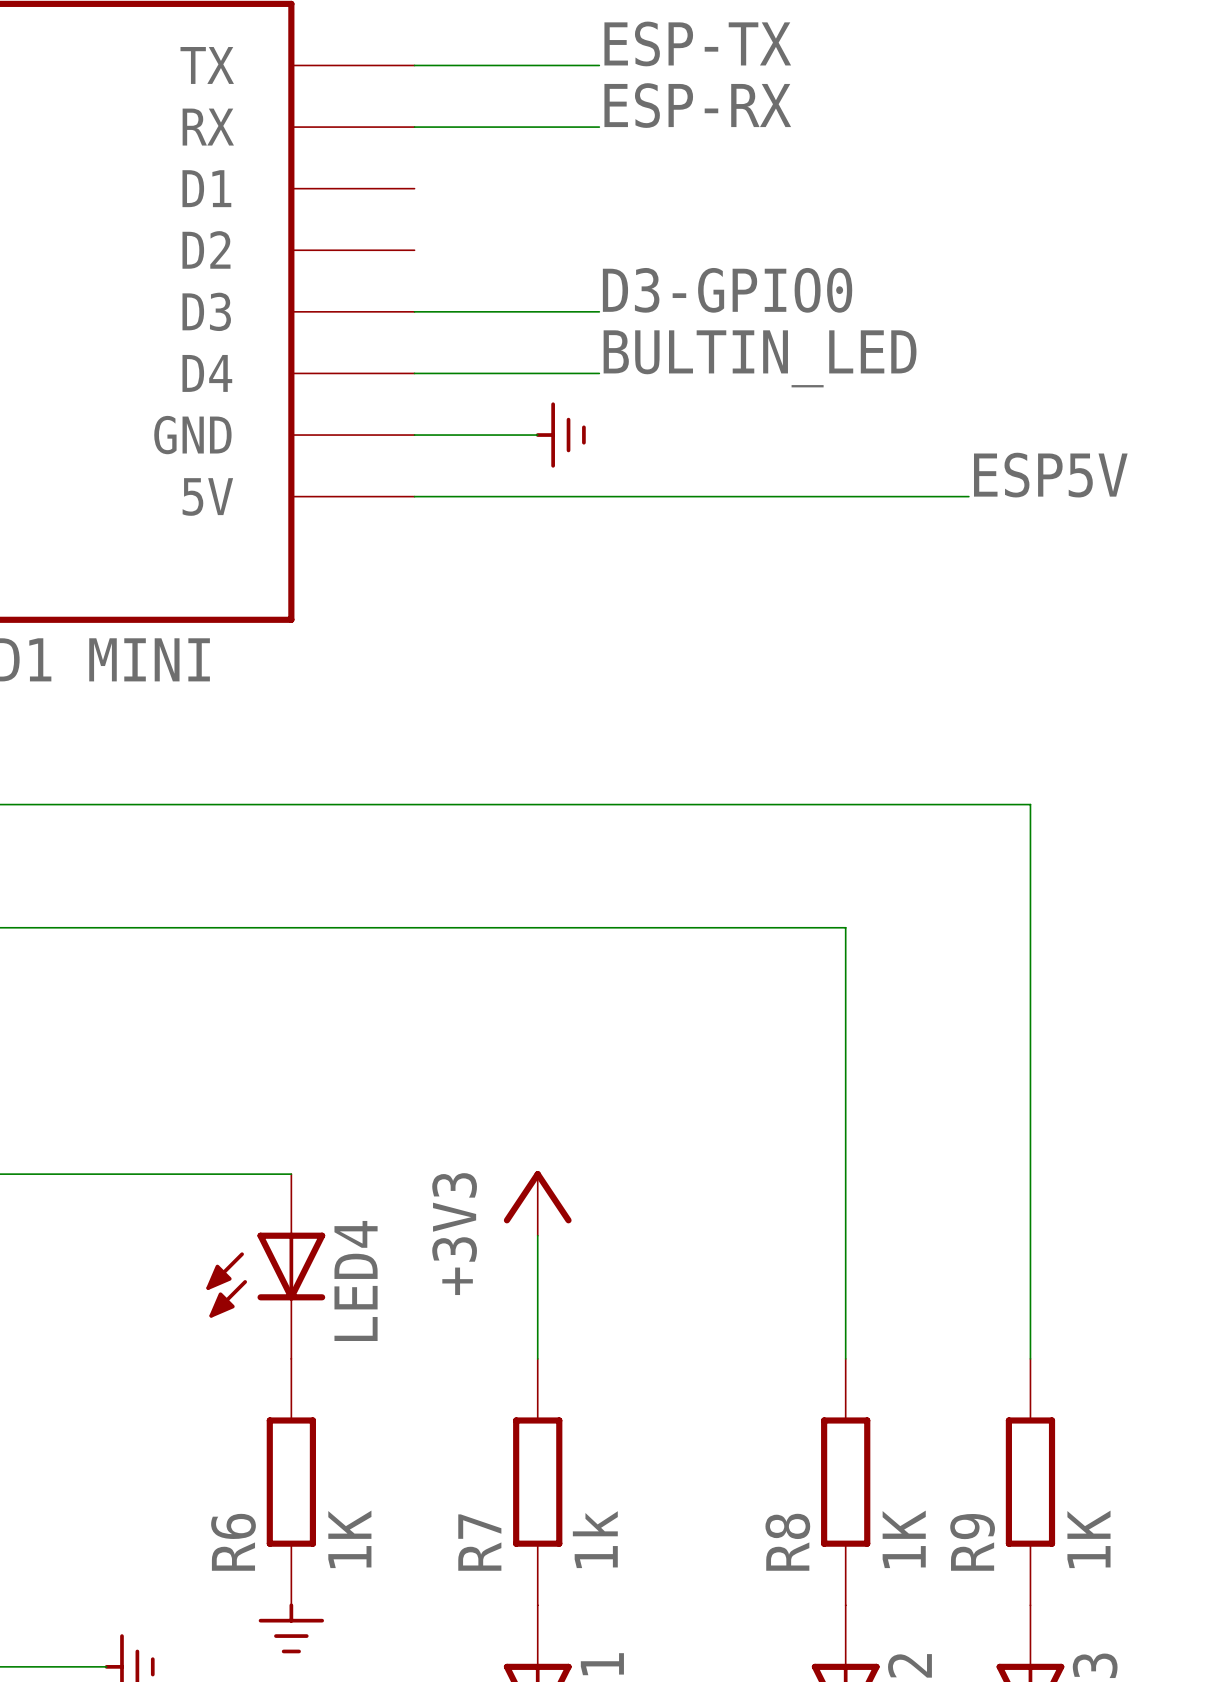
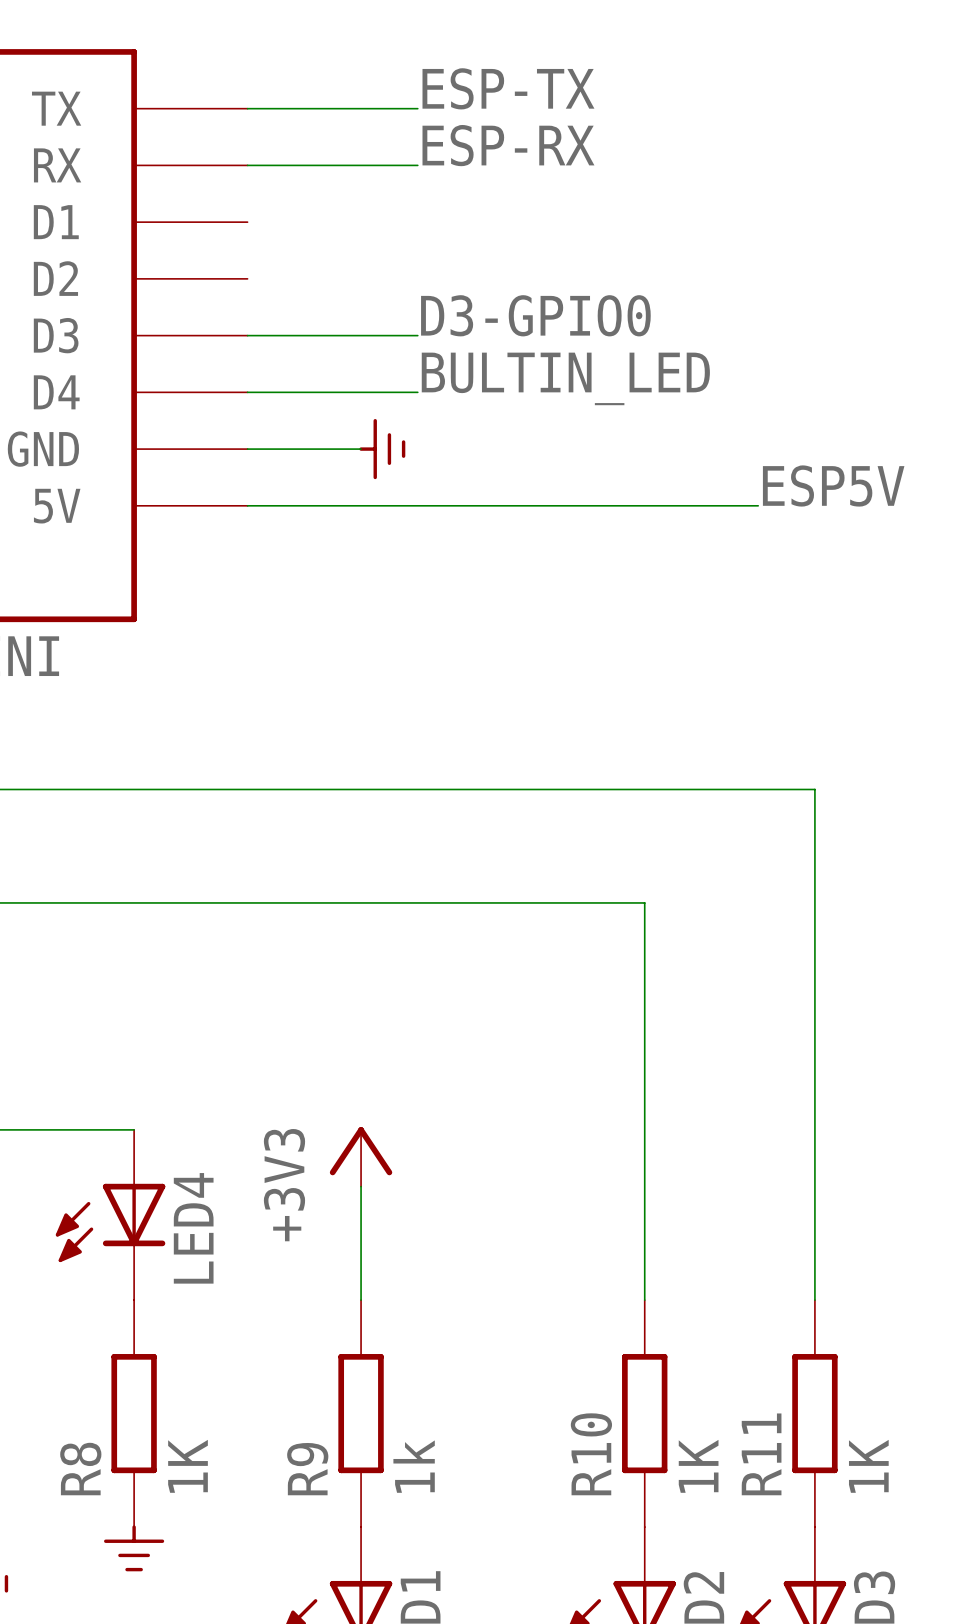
R6 name: R6 (233, 1542) -> R8 (80, 1469)
R7 name: R7 (479, 1542) -> R9 (307, 1469)
R8 name: R8 (787, 1542) -> R10 (591, 1454)
R9 name: R9 (972, 1542) -> R11 (761, 1454)

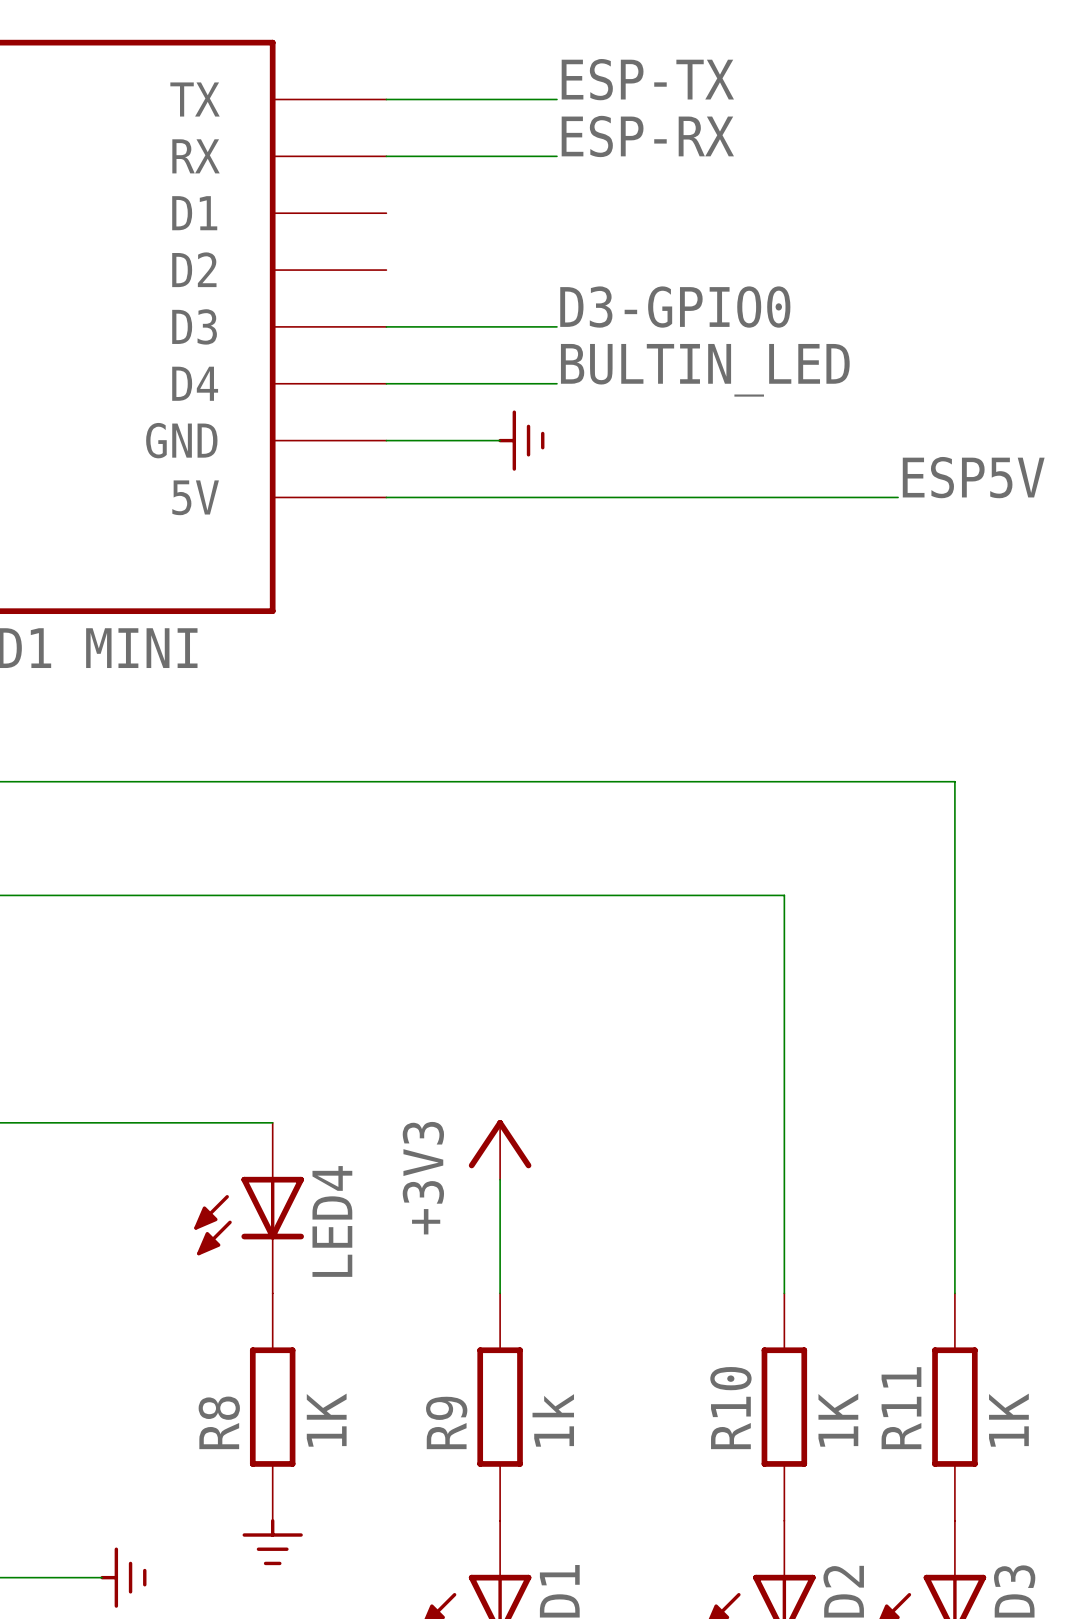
R10 name position: R10 (591, 1454) -> R10 (730, 1408)
R11 name position: R11 (761, 1454) -> R11 (901, 1408)
R8 value position: 1K (188, 1466) -> 1K (326, 1420)
R9 value position: 1k (414, 1466) -> 1k (553, 1420)
R10 value position: 1K (698, 1466) -> 1K (838, 1420)
R11 value position: 1K (868, 1466) -> 1K (1008, 1420)
R8 name position: R8 (80, 1469) -> R8 (219, 1422)
R9 name position: R9 (307, 1469) -> R9 (446, 1422)

